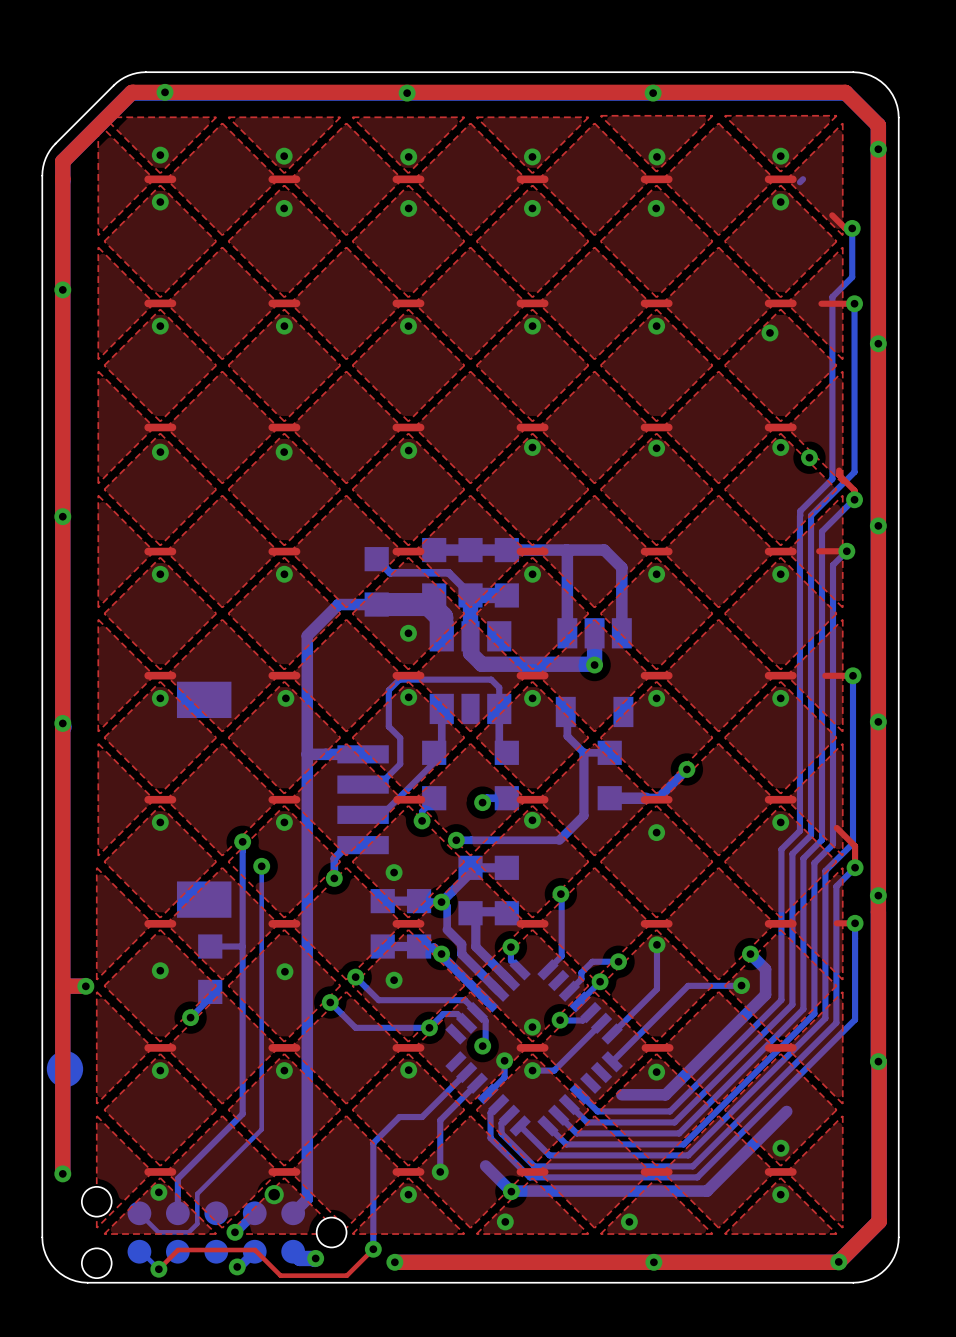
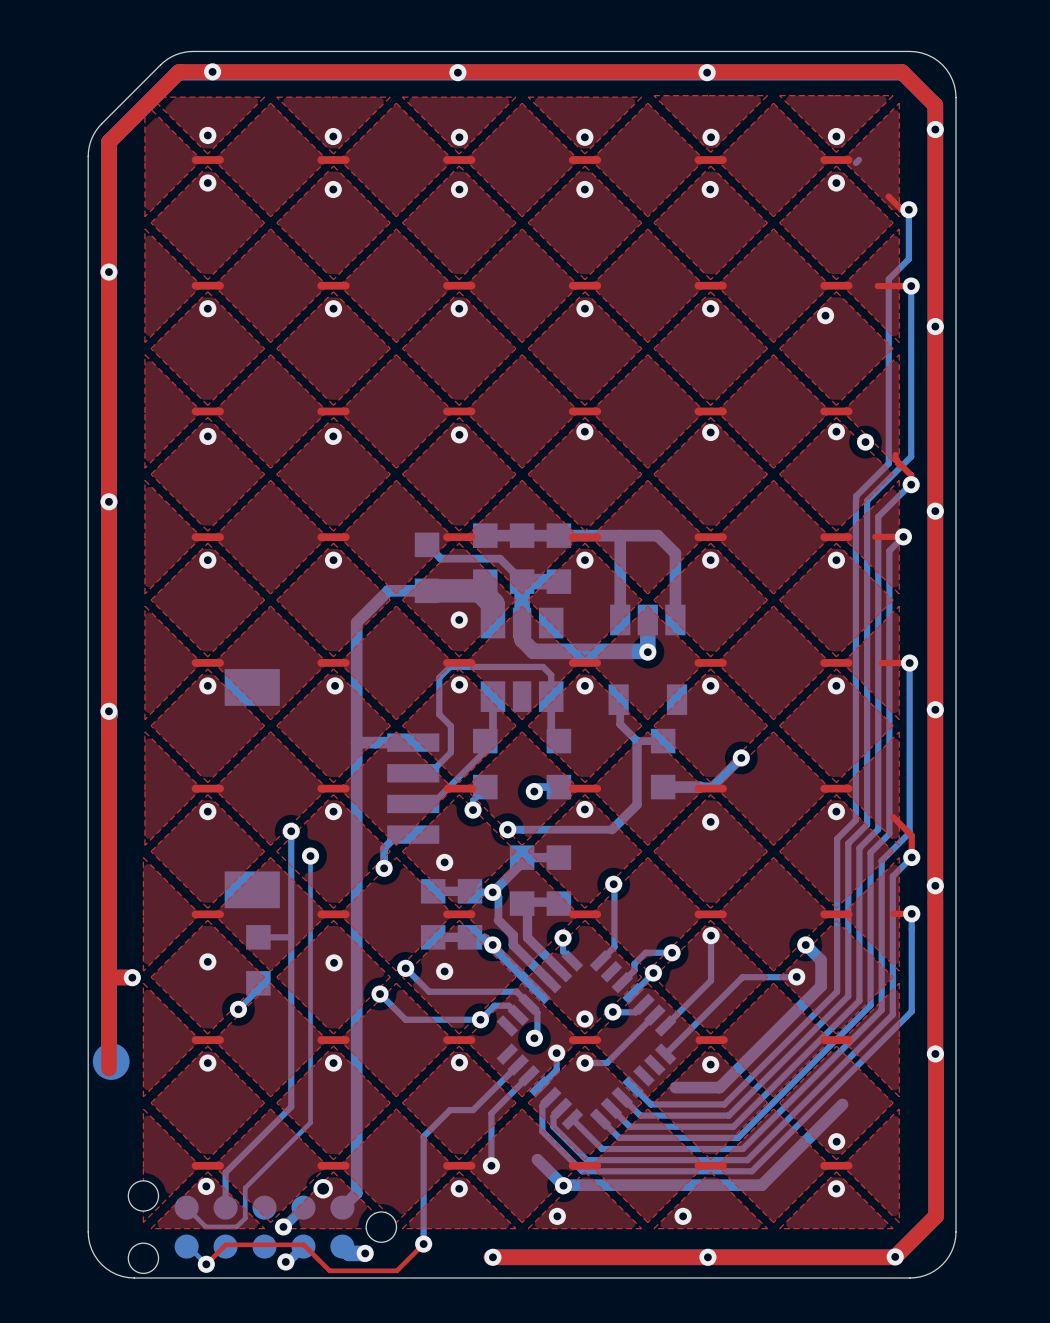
top track: (62, 1076) (62, 1173) -> none
via: (62, 1173) -> none
top track: (394, 1262) (440, 1262) -> none
via position: (394, 1262) -> (492, 1257)

